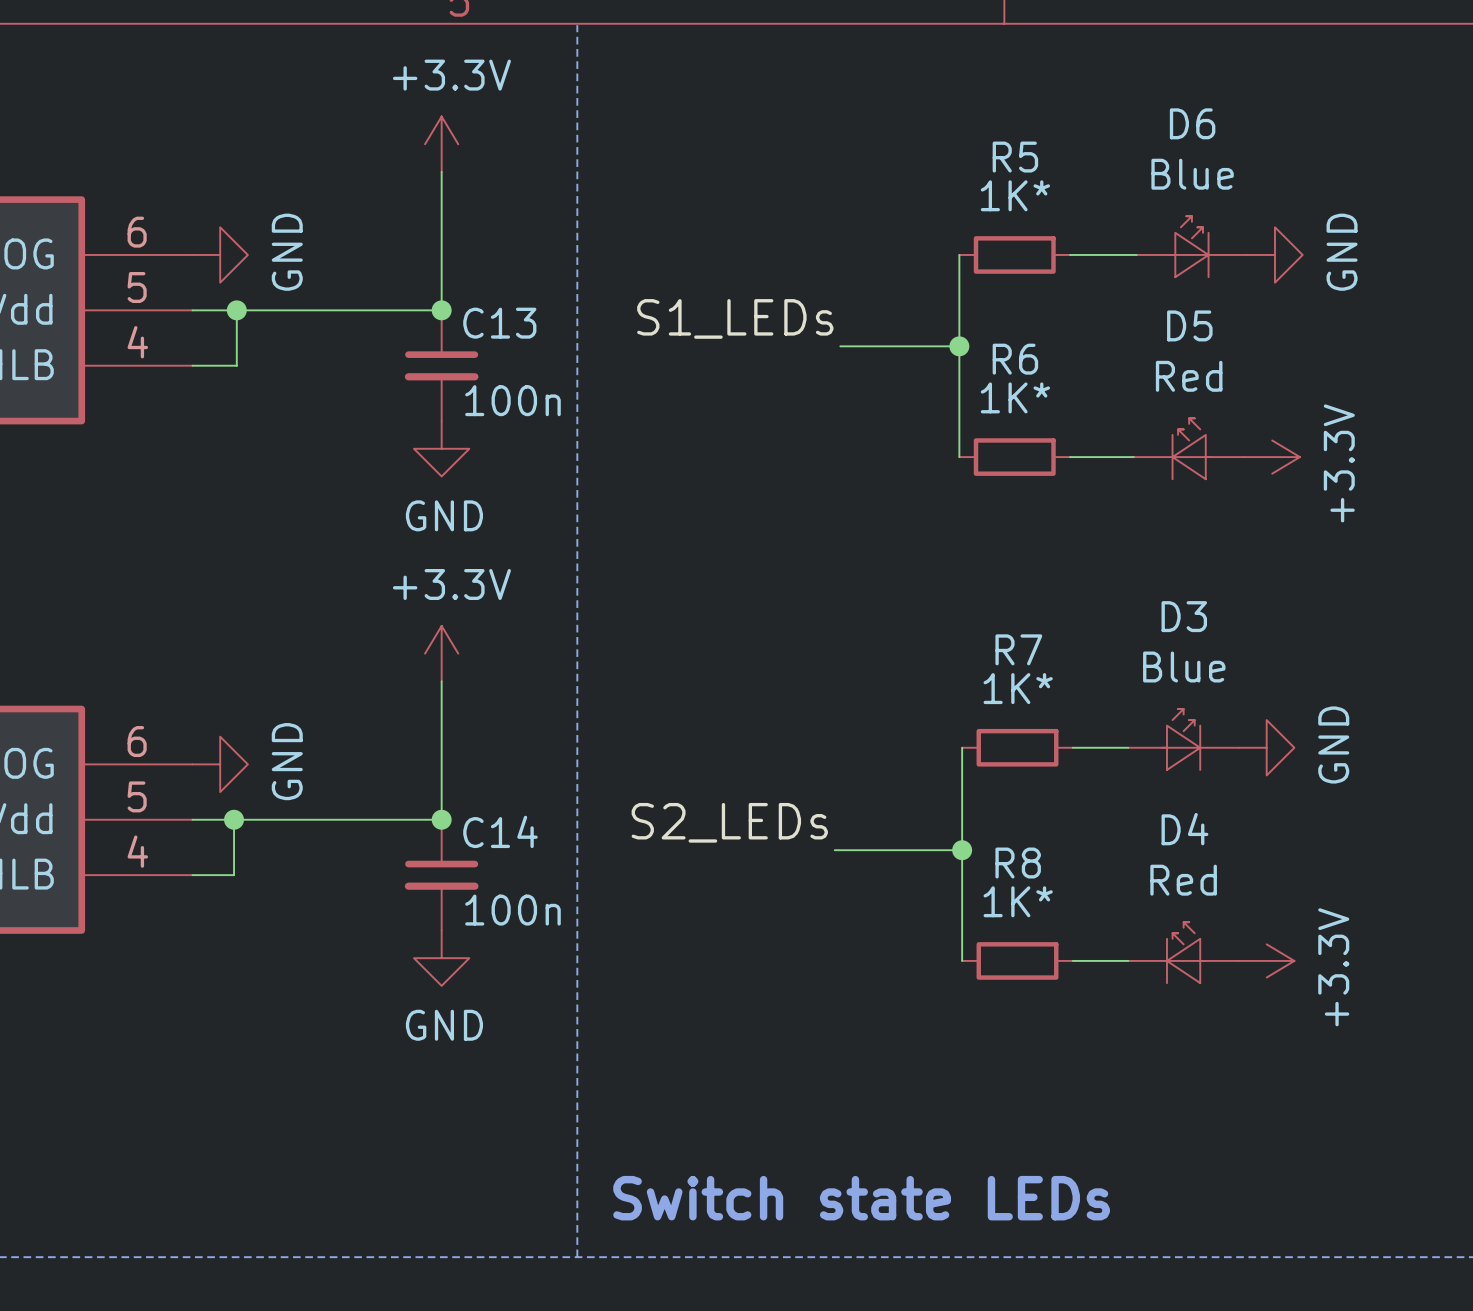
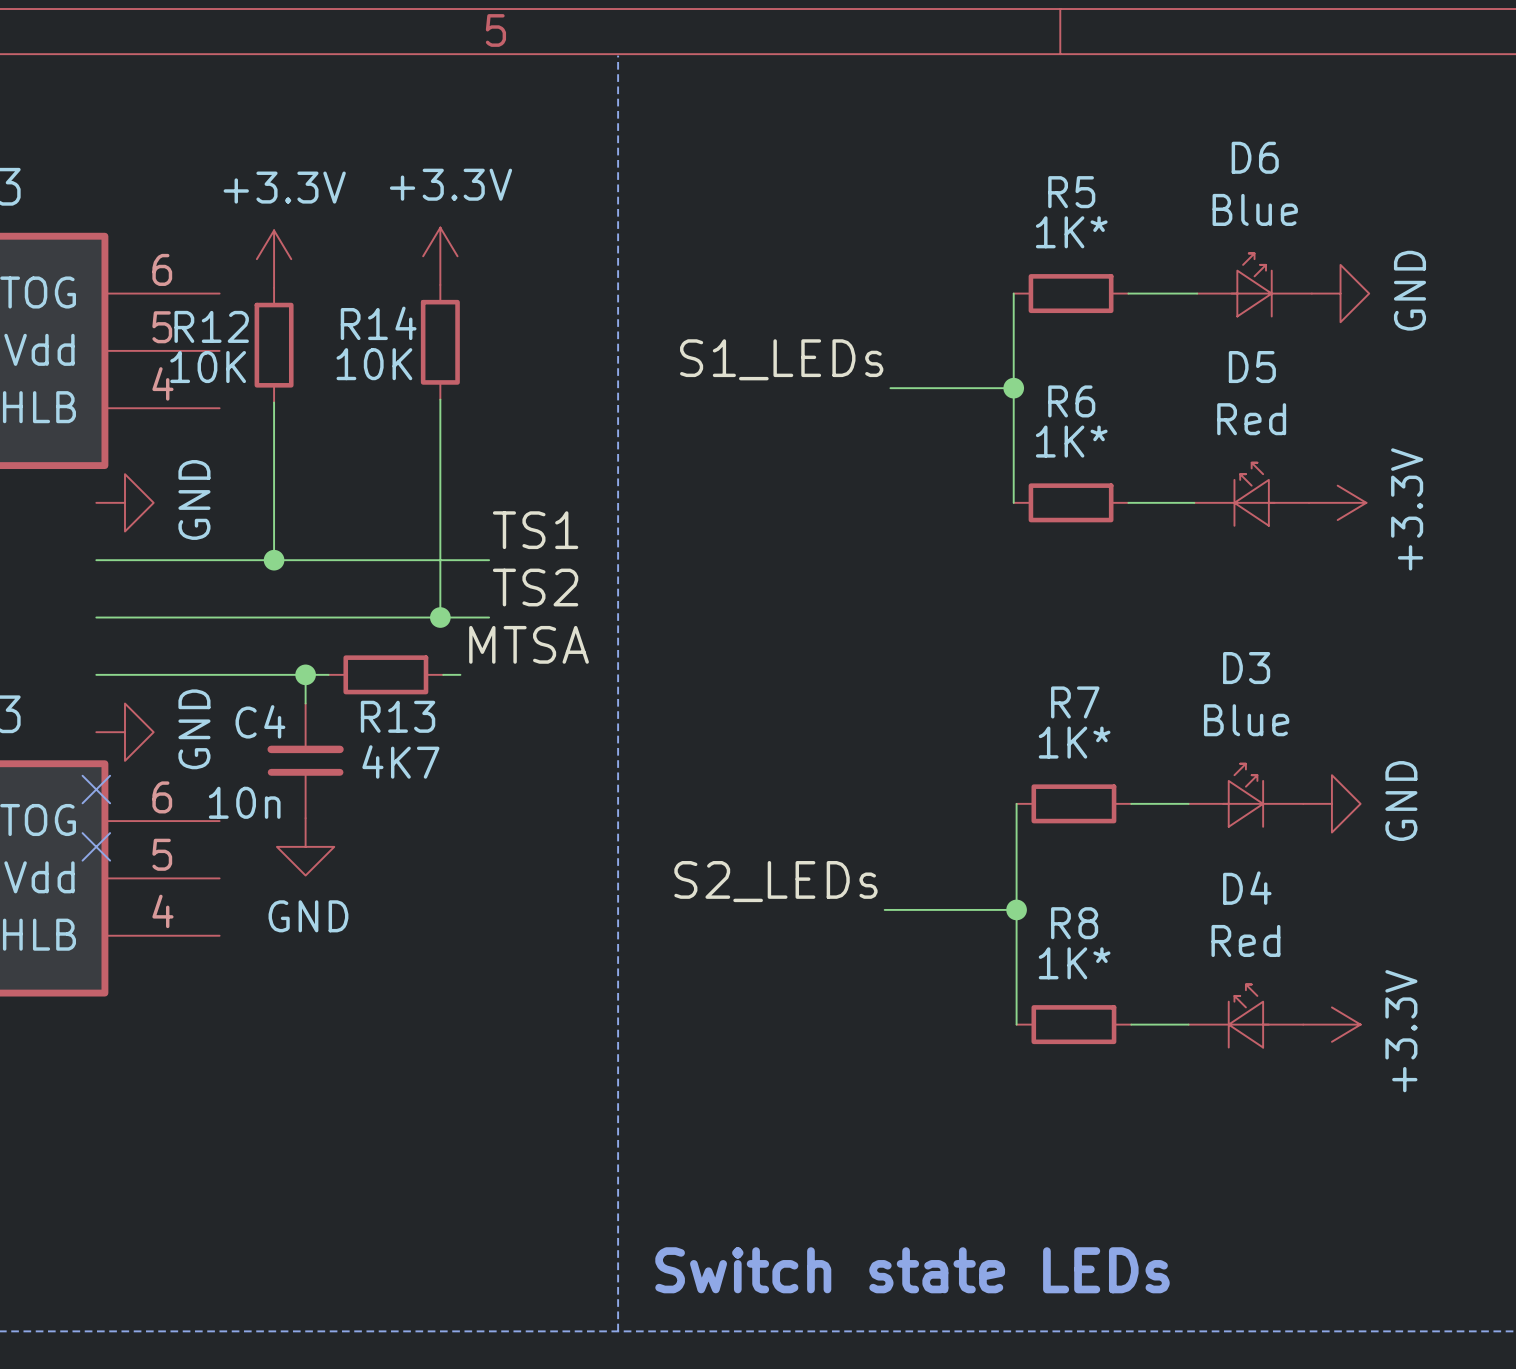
power symbol position: +3.3V (441, 144) -> +3.3V (440, 256)
wire: (441, 171) (441, 310) (192, 310) -> none
power symbol: none -> +3.3V (274, 259)
power symbol: GND (220, 254) -> none
R14: none -> 10K (440, 342)
R12: none -> 10K (274, 345)
wire: (236, 310) (236, 365) (192, 365) -> none
junction: (236, 310) -> none
junction: (441, 310) -> none
wire: none -> (440, 399) (440, 617)
wire: none -> (274, 402) (274, 560)
C13: 100n (441, 365) -> none
power symbol: GND (441, 448) -> none
power symbol: none -> GND (125, 502)
label: none -> TS1 (535, 530)
wire: none -> (96, 560) (489, 560)
junction: none -> (274, 560)
label: none -> TS2 (535, 587)
wire: none -> (96, 617) (489, 617)
junction: none -> (440, 617)
label: none -> MTSA (529, 644)
wire: none -> (96, 674) (328, 674)
wire: none -> (305, 674) (305, 703)
junction: none -> (305, 674)
R13: none -> 4K7 (385, 674)
wire: none -> (443, 674) (460, 674)
power symbol: +3.3V (441, 653) -> none
power symbol: none -> GND (125, 732)
wire: (441, 681) (441, 819) (192, 819) -> none
C4: none -> 10n (305, 760)
no-connect mark: none -> (96, 789)
power symbol rotation: 0° (220, 764) -> 90° clockwise (305, 846)
power symbol position: GND (220, 764) -> GND (305, 846)
no-connect mark: none -> (96, 846)
wire: (234, 819) (234, 875) (192, 875) -> none
junction: (234, 819) -> none
junction: (441, 819) -> none
C14: 100n (441, 875) -> none
power symbol: GND (441, 958) -> none

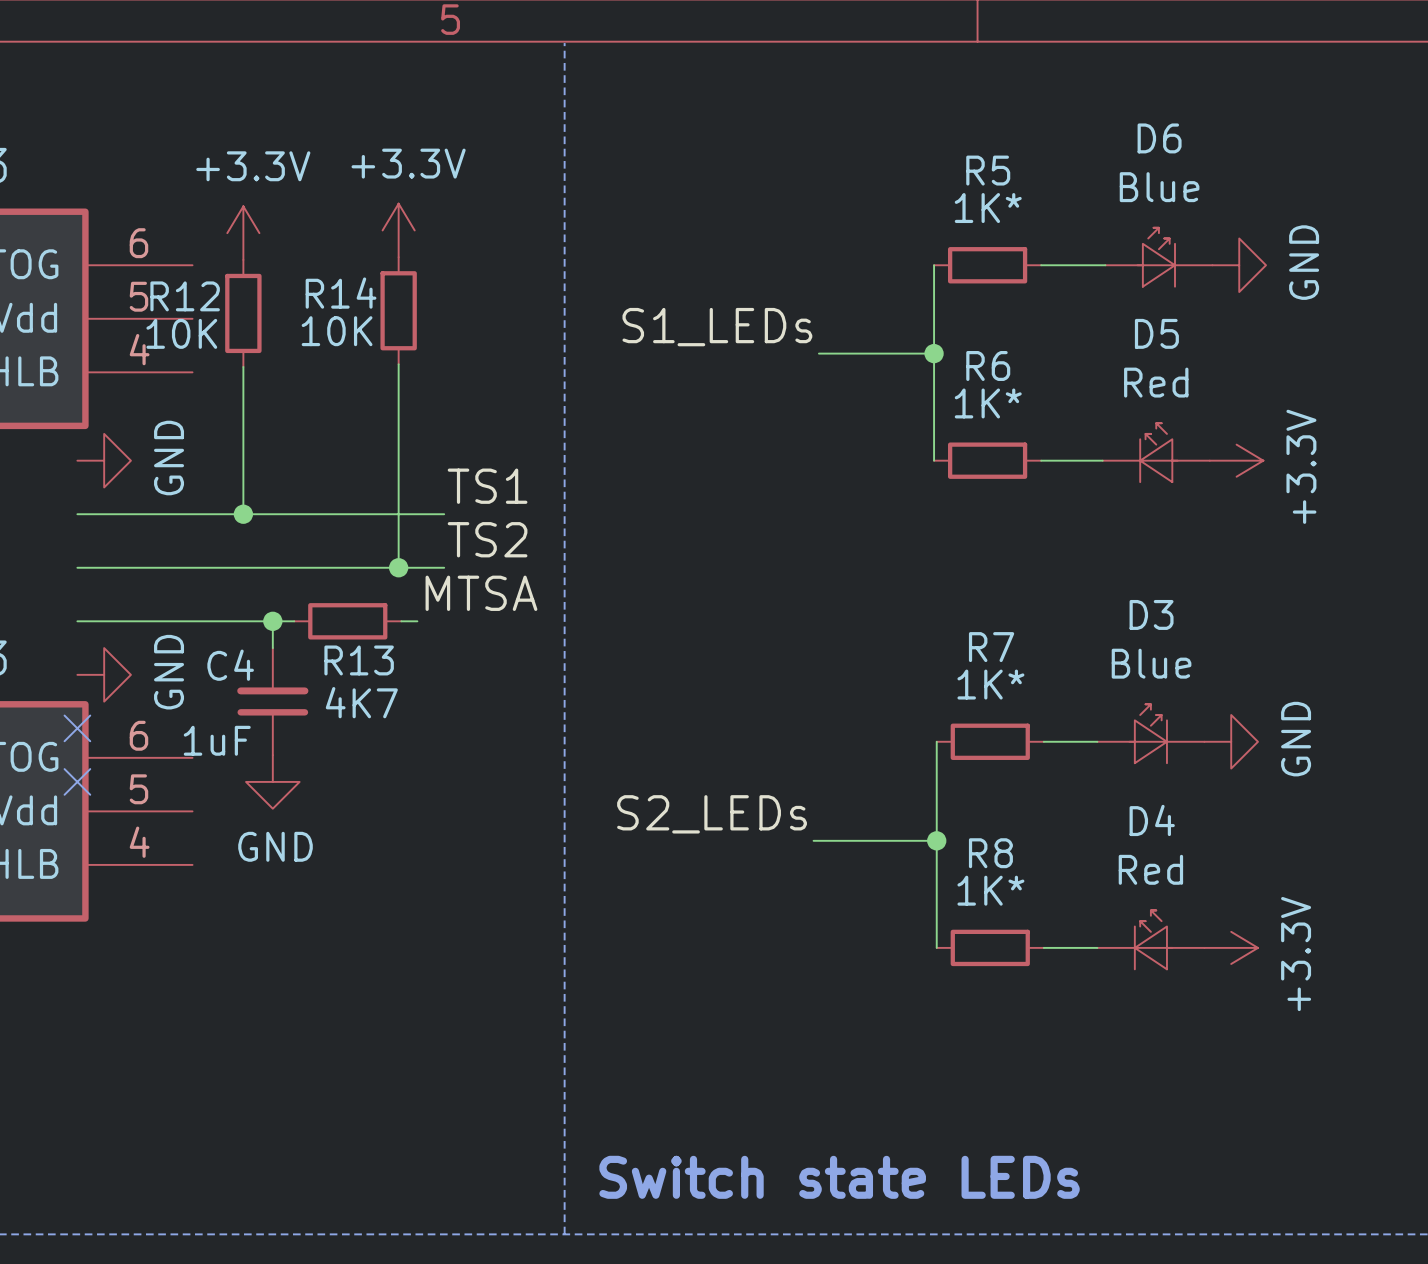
C4 value: 10n (244, 802) -> 1uF (217, 740)

